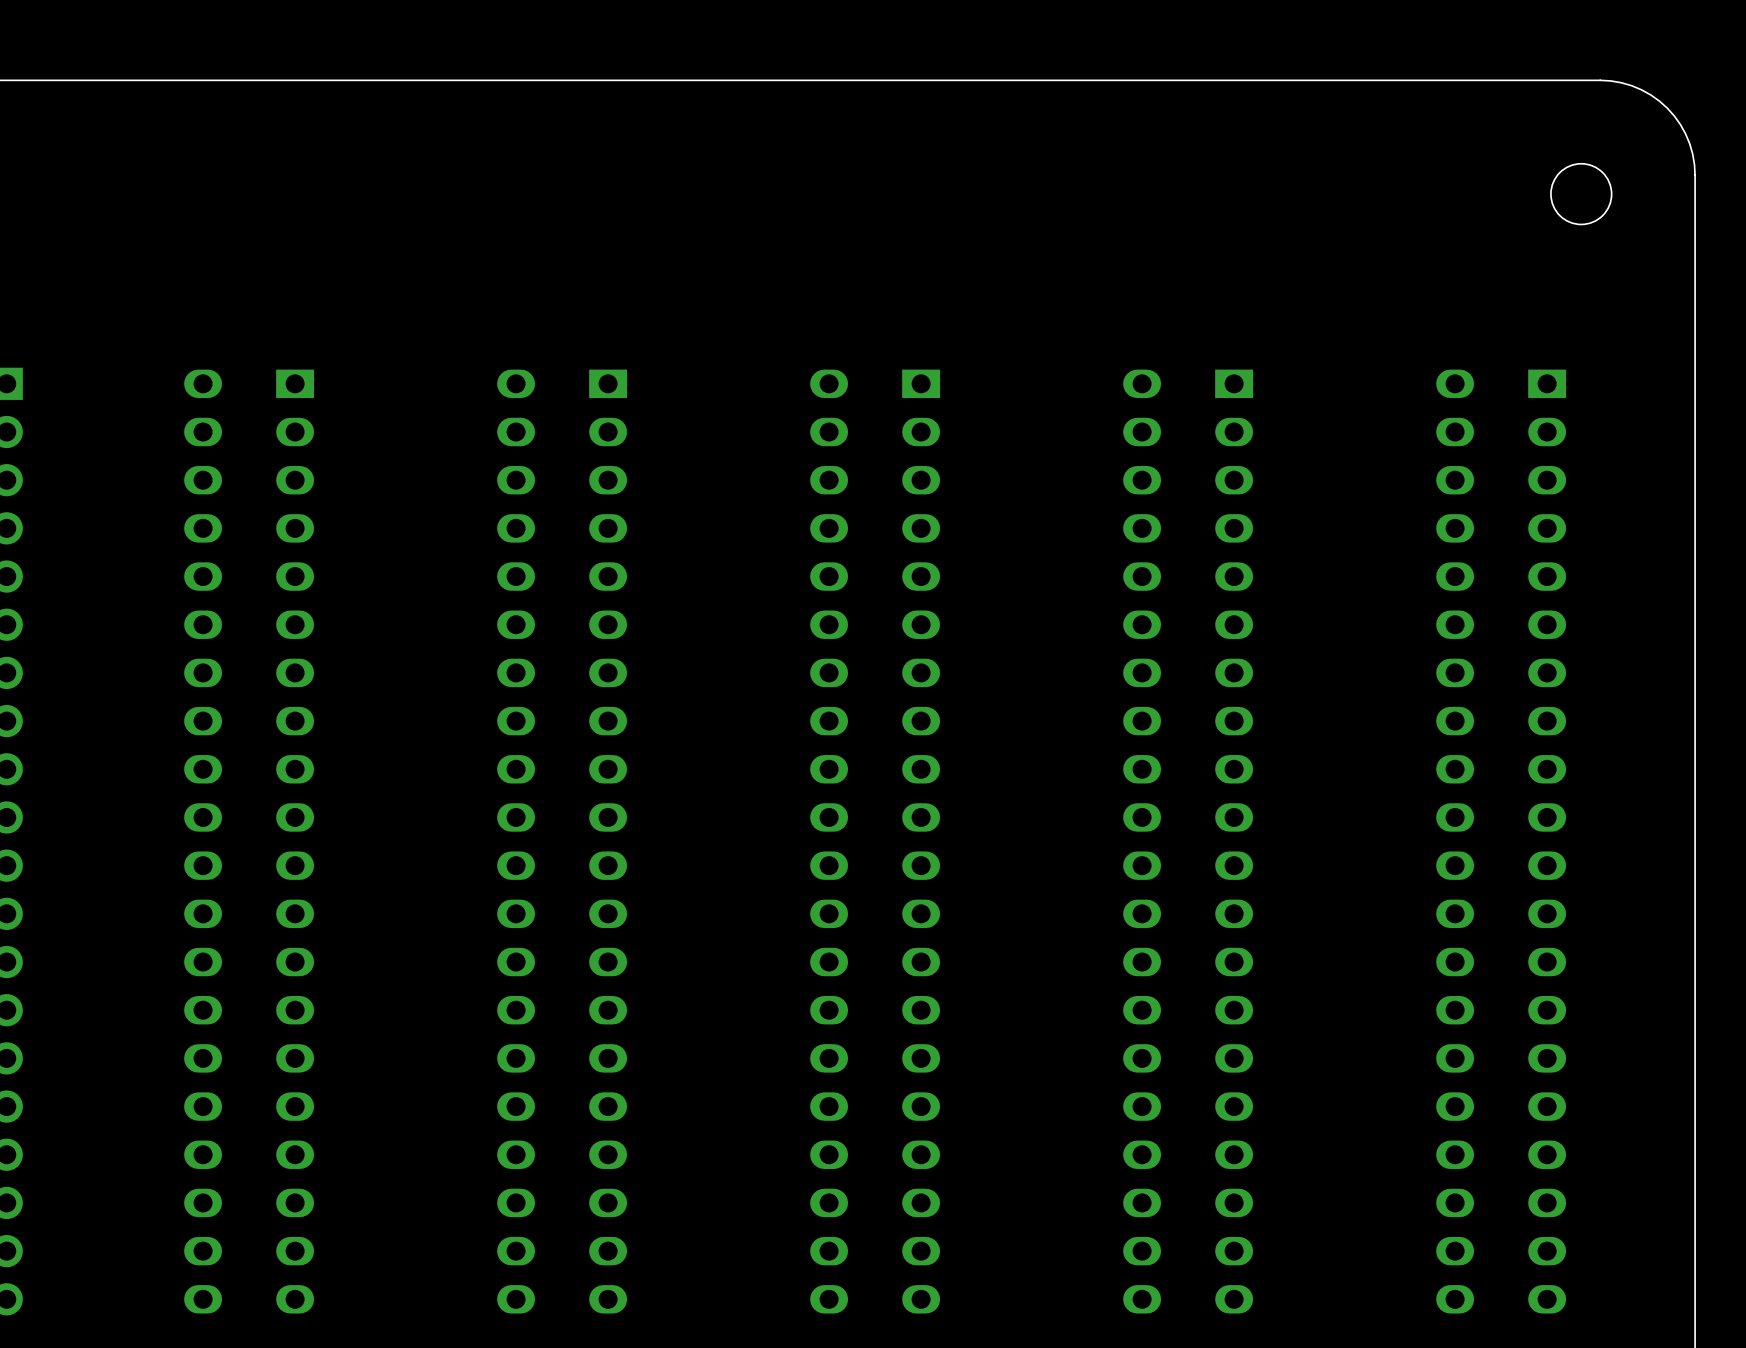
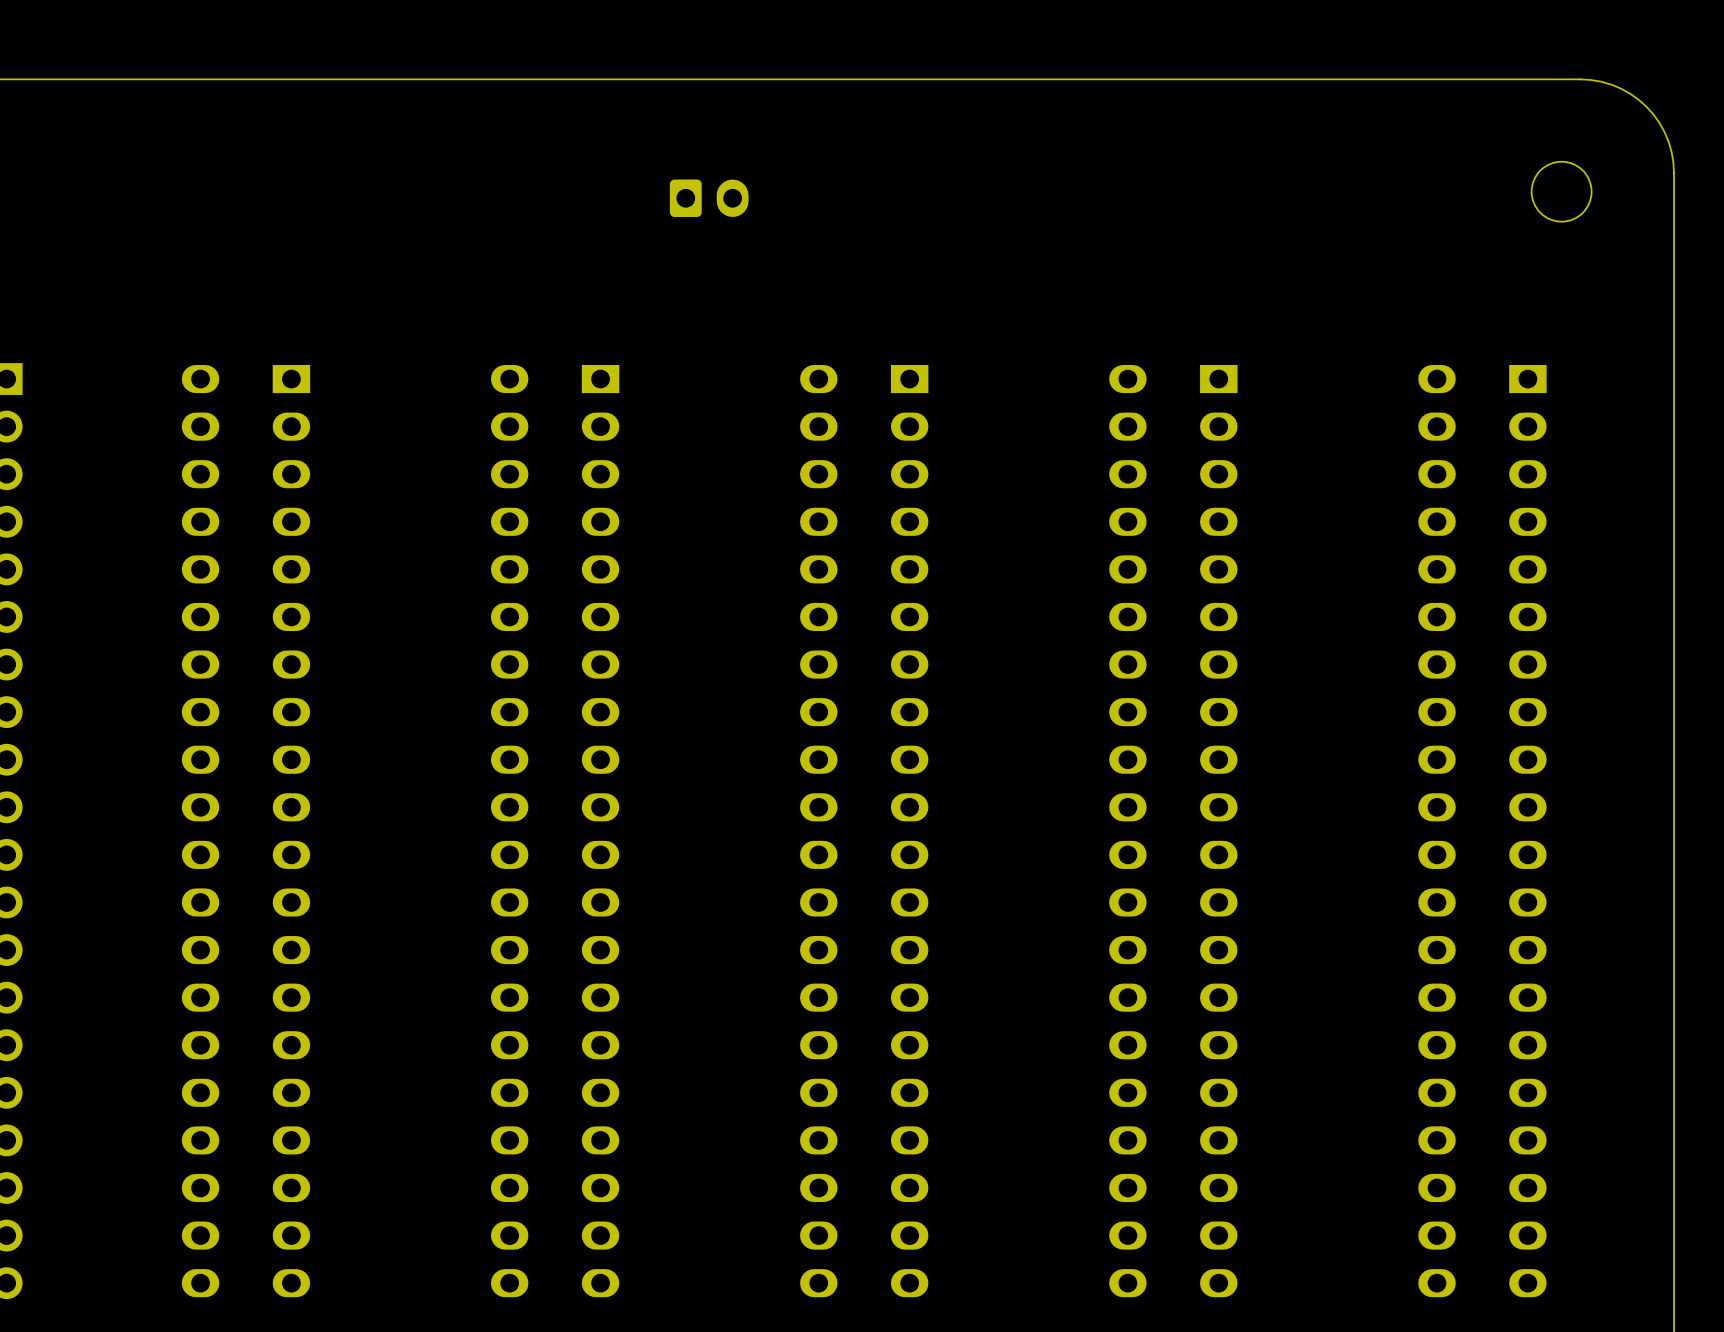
part: none -> (709, 198)

